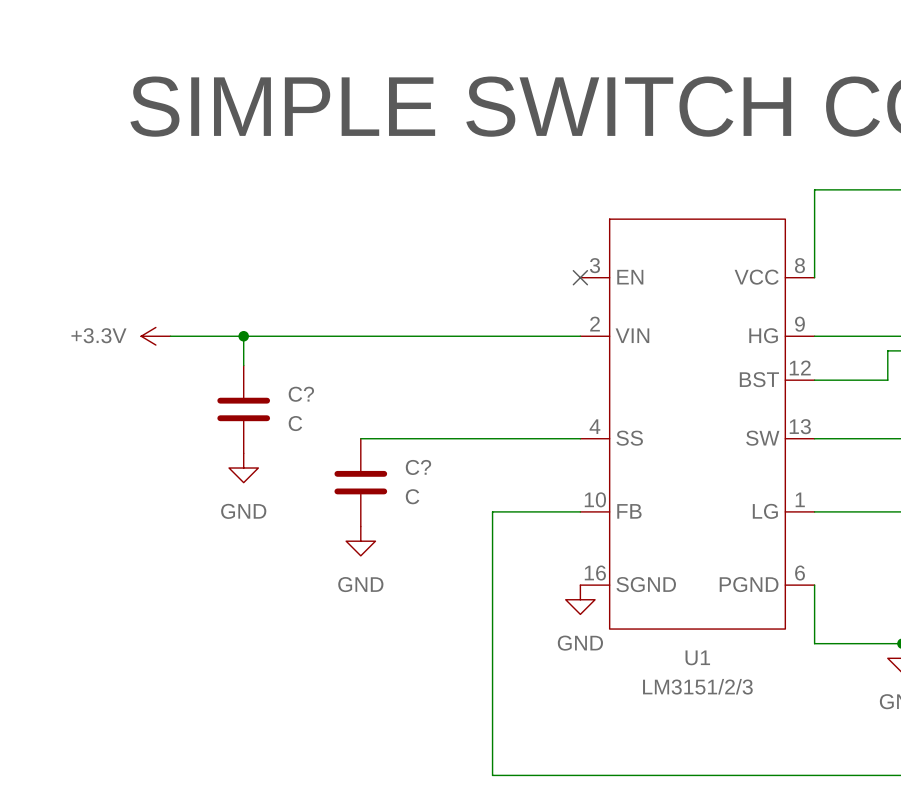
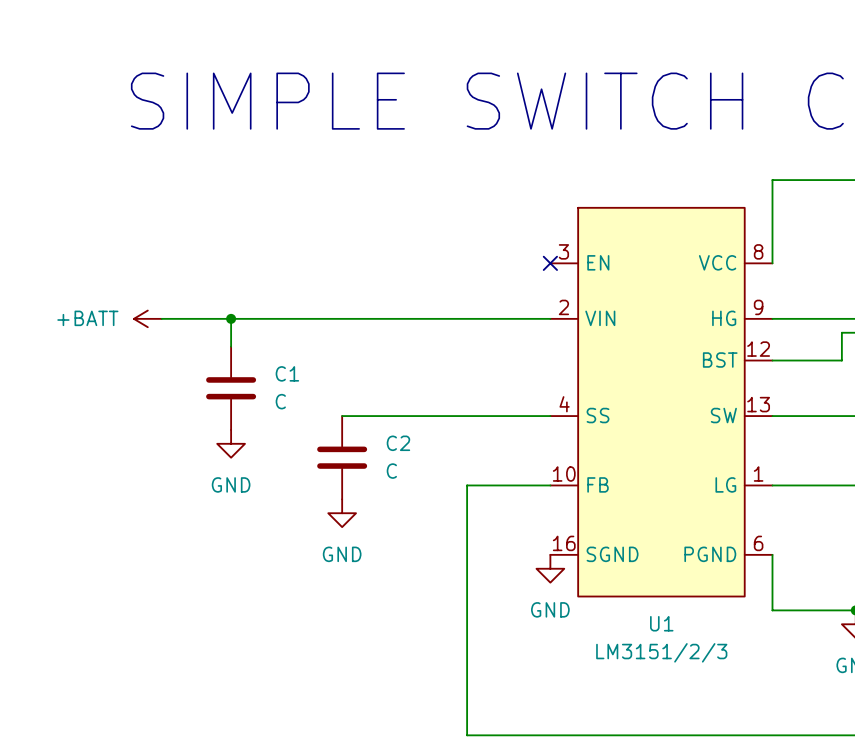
power symbol: +3.3V (155, 336) -> +BATT (147, 318)
C? name: C? (301, 394) -> C1 (287, 373)
C? name: C? (418, 467) -> C2 (398, 443)

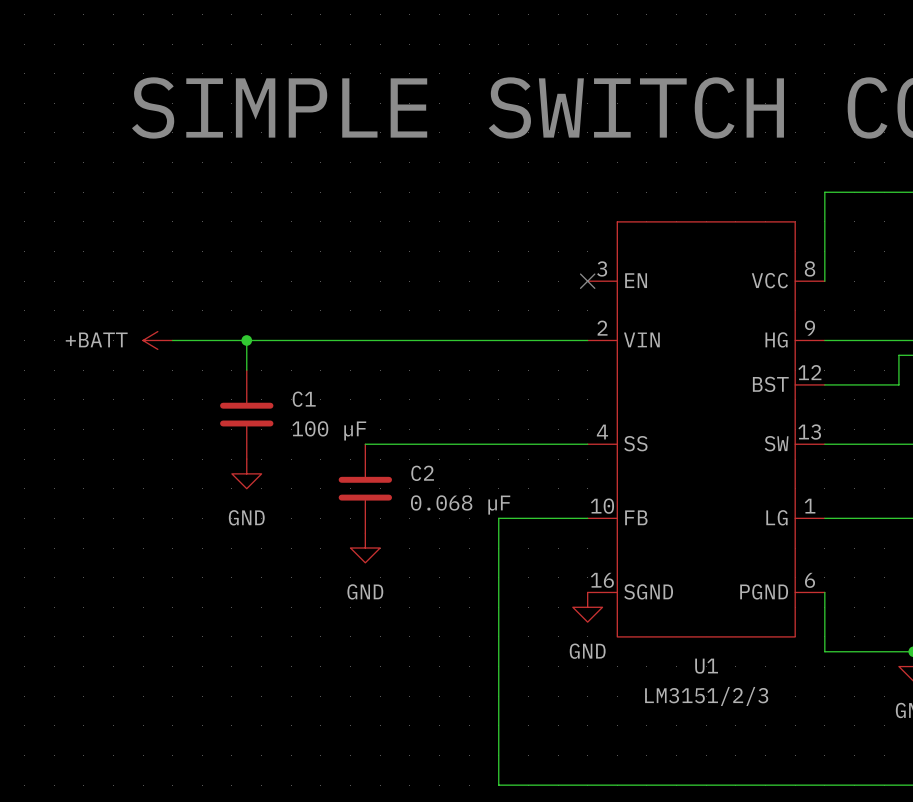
C1 value: C (280, 401) -> 100 µF (329, 430)
C2 value: C (391, 471) -> 0.068 µF (460, 504)

